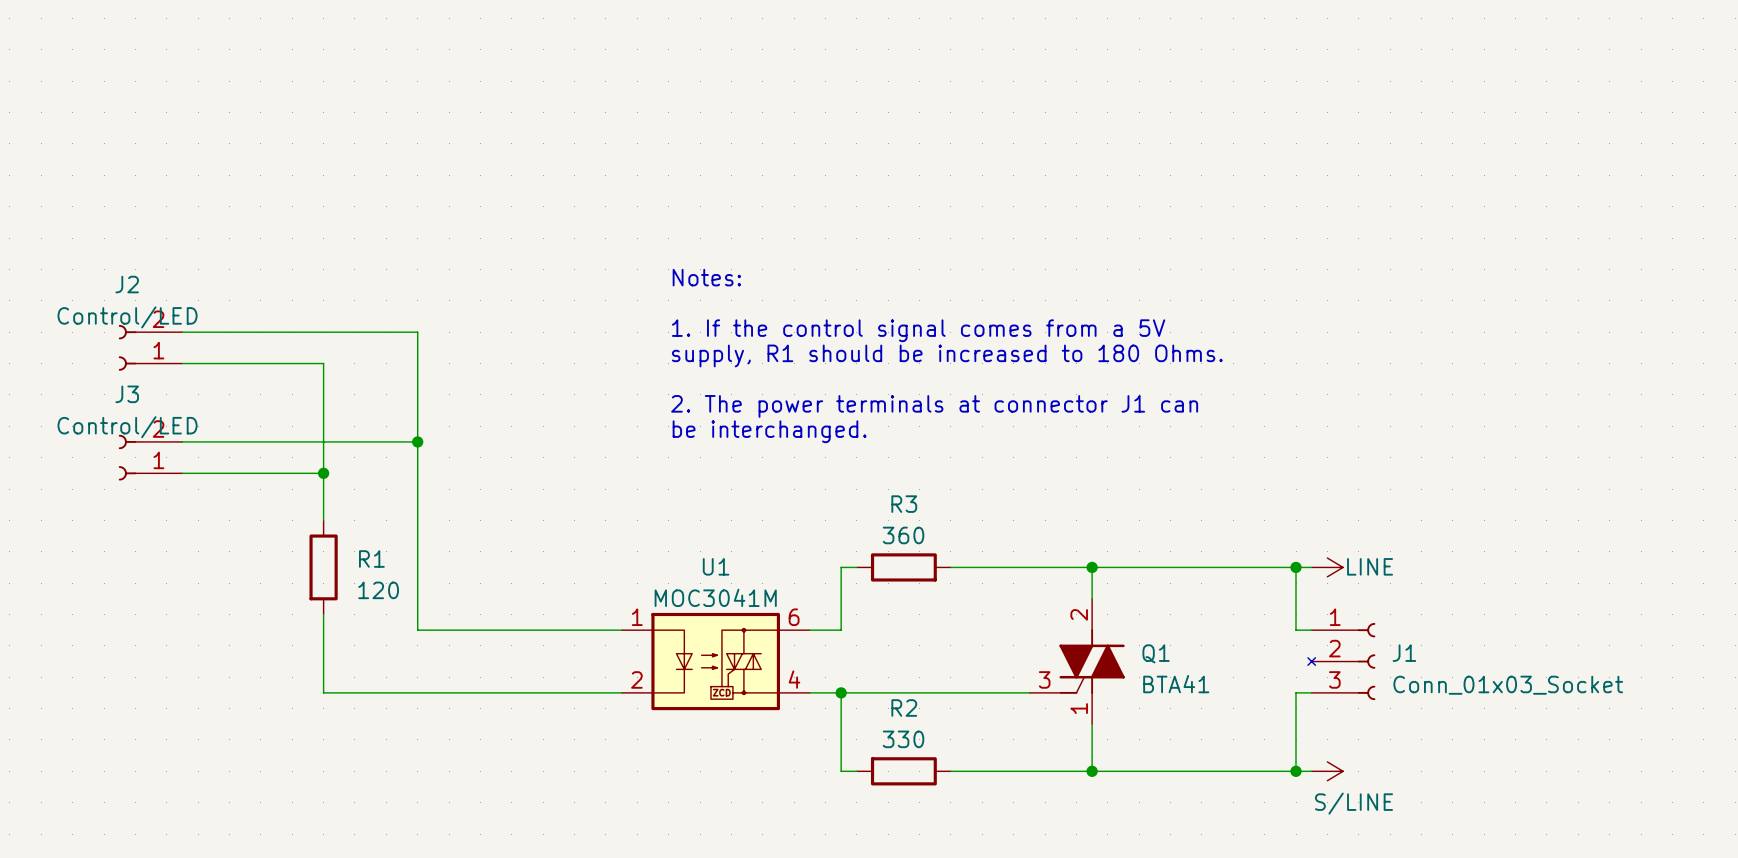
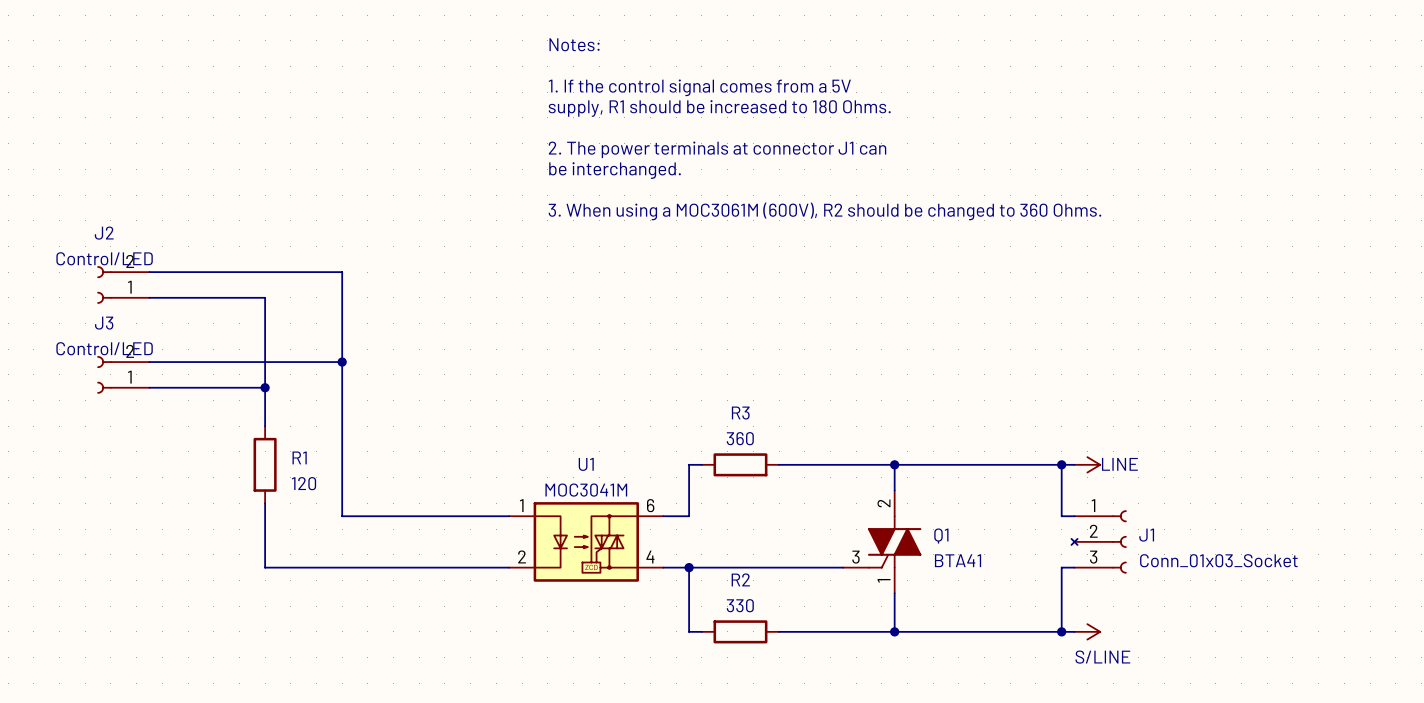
text: none -> 3. When using a MOC3061M (600V), R2 should be changed to 360 Ohms. (824, 211)
text position: Notes: (706, 277) -> Notes: (574, 44)
text position: 1. If the control signal comes from a 5V (918, 330) -> 1. If the control signal comes from a 5V (699, 87)
text position: supply, R1 should be increased to 180 Ohms. (947, 355) -> supply, R1 should be increased to 180 Ohms. (719, 108)
text position: 2. The power terminals at connector J1 can (934, 406) -> 2. The power terminals at connector J1 can (717, 149)
text position: be interchanged. (769, 431) -> be interchanged. (615, 170)

